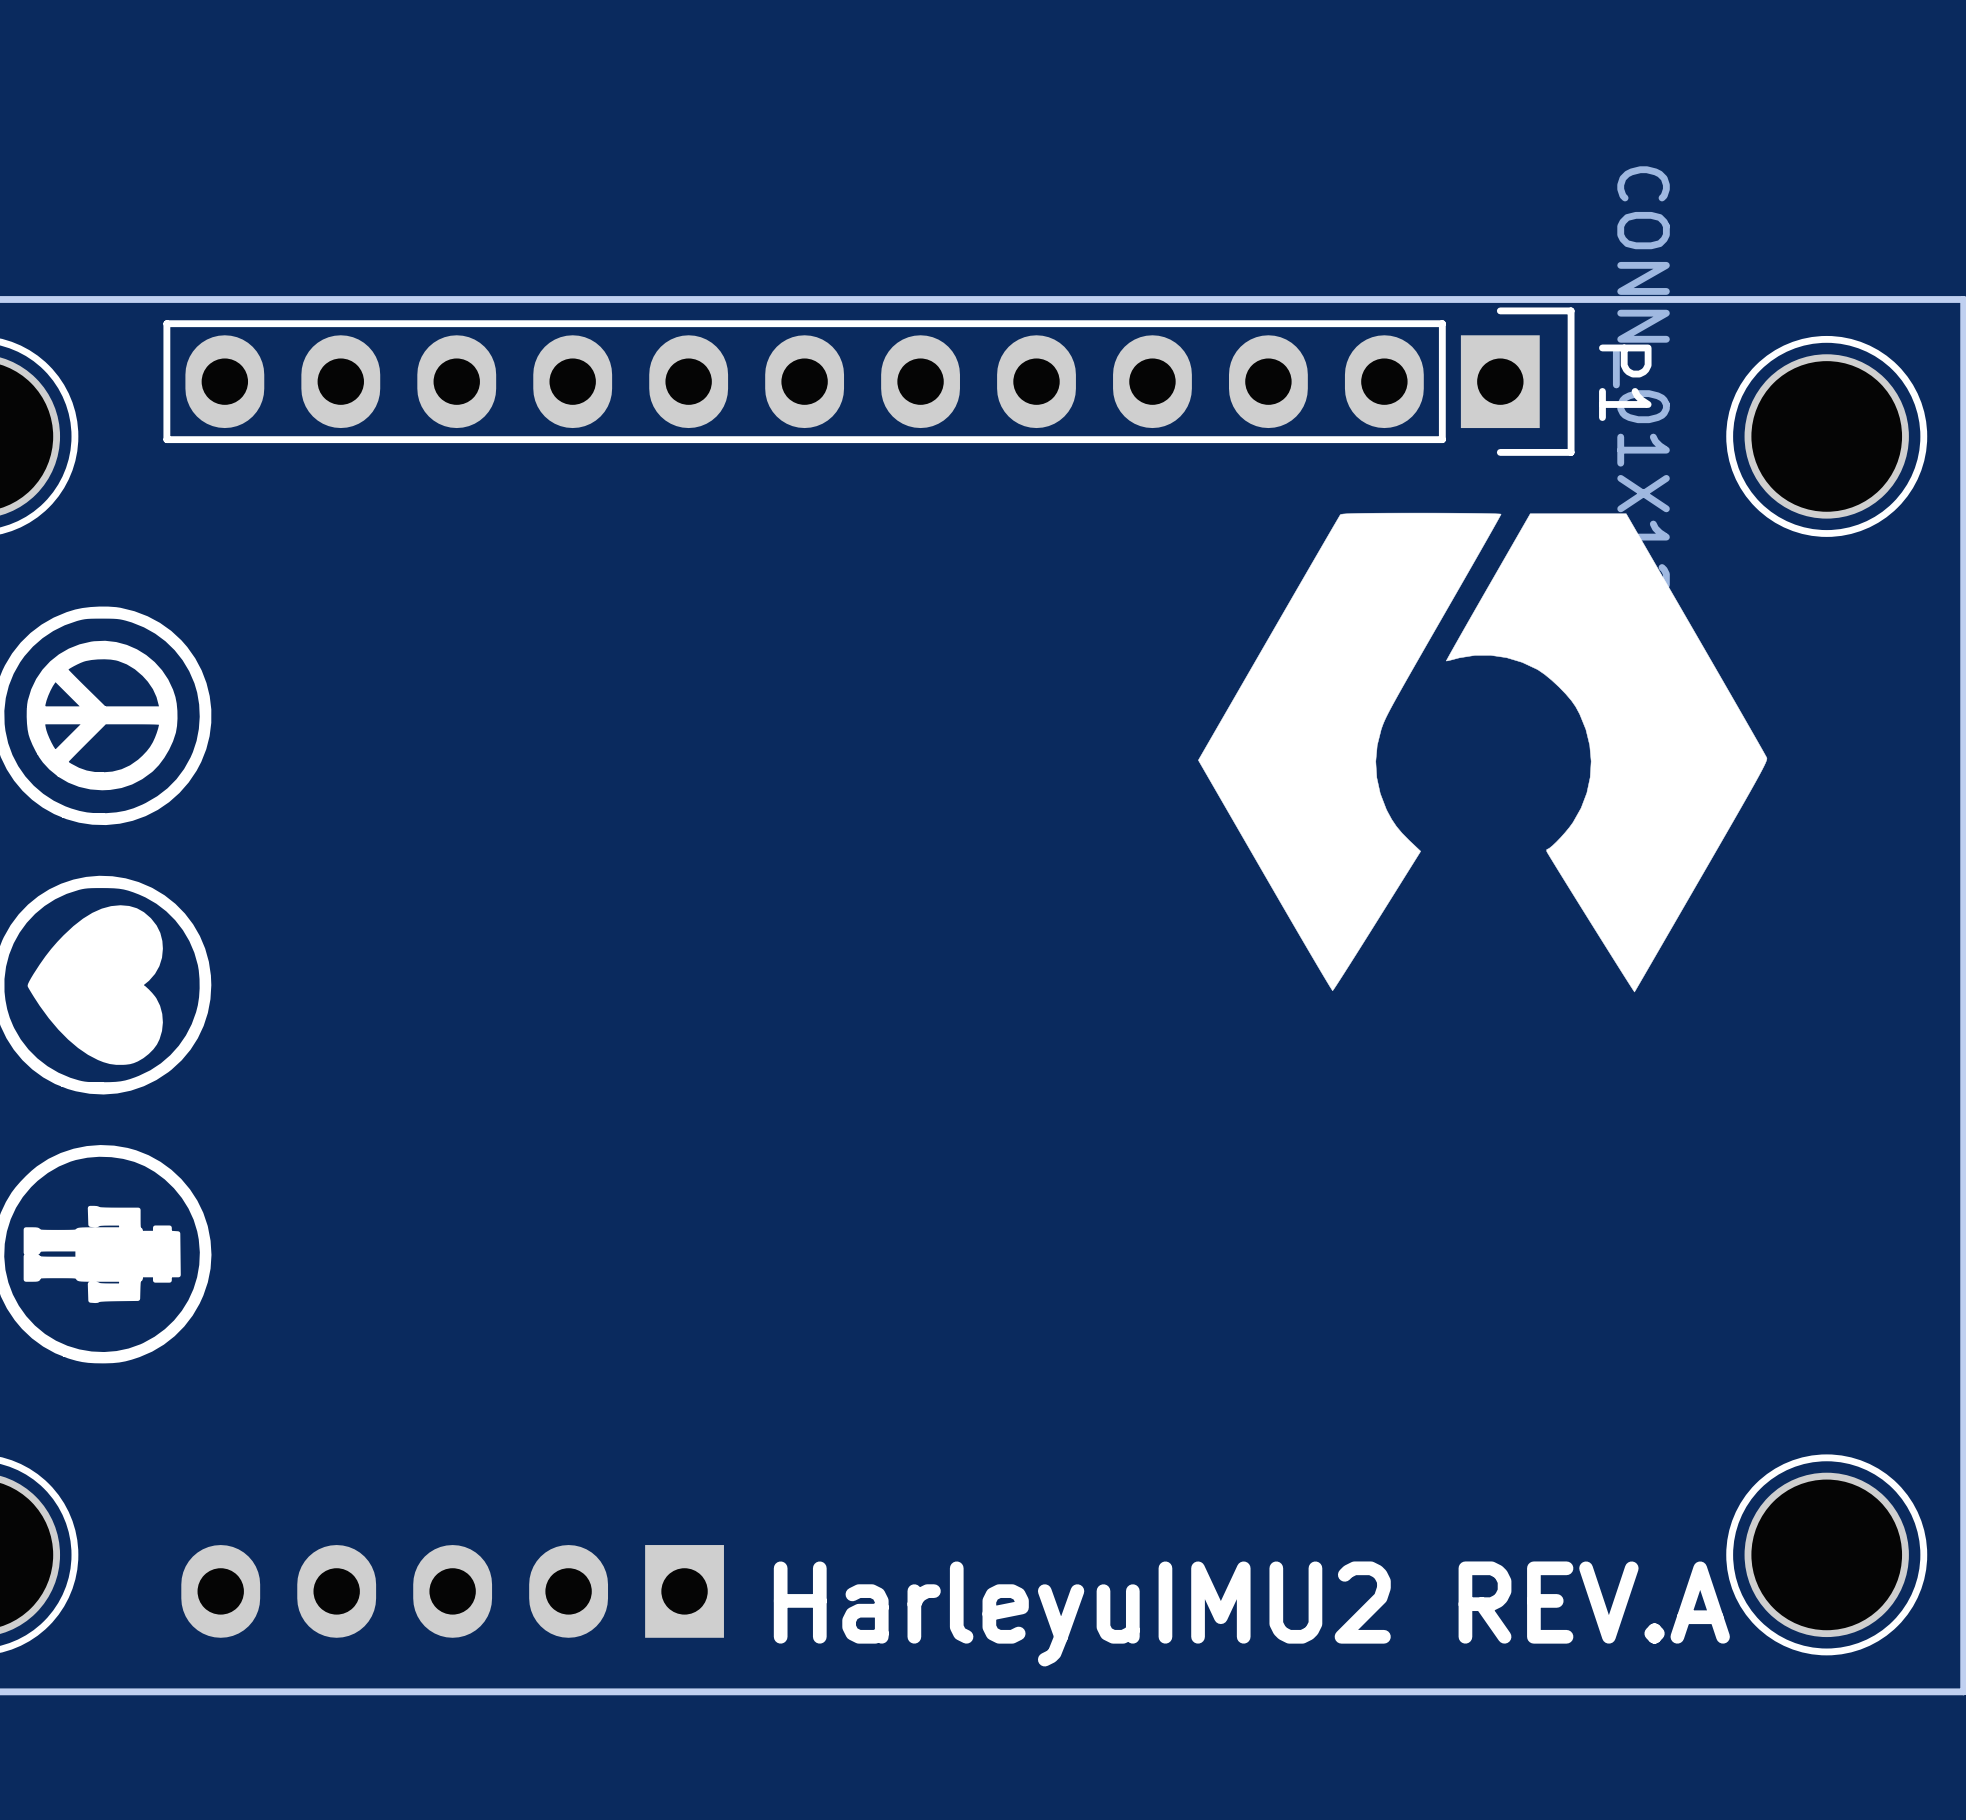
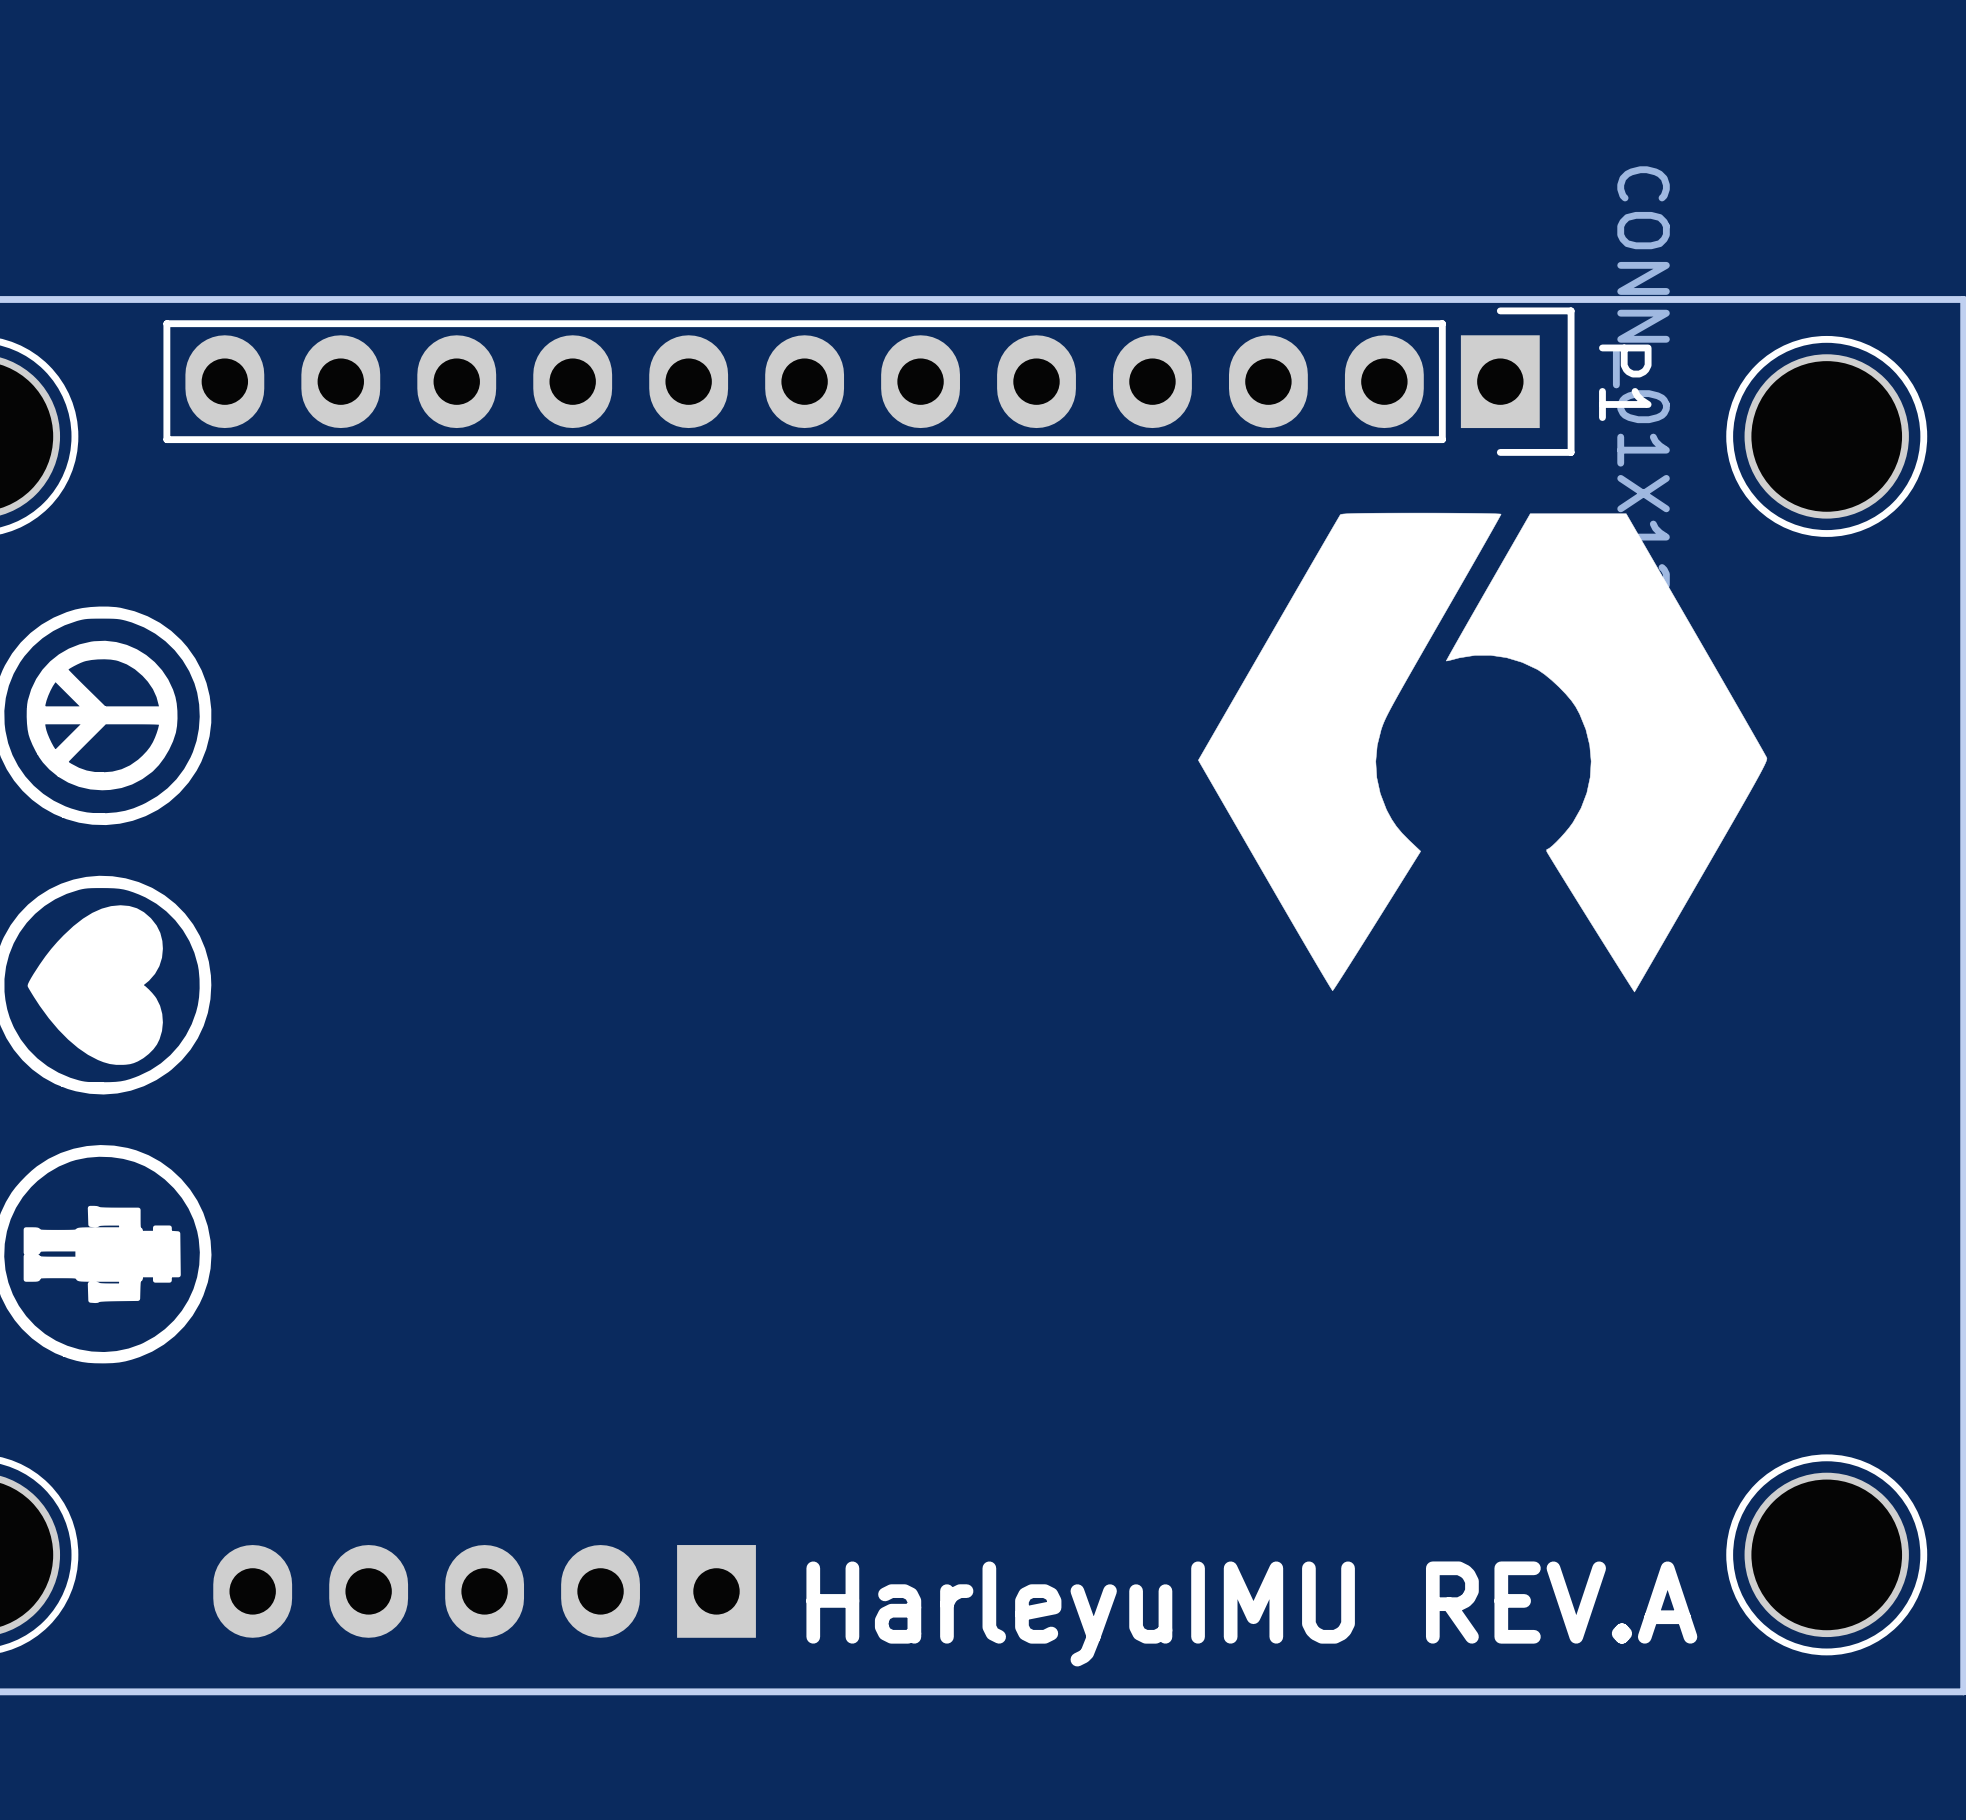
part position: (452, 1591) -> (484, 1591)
text: HarleyuIMU2 REV.A (1251, 1613) -> HarleyuIMU REV.A (1251, 1613)

